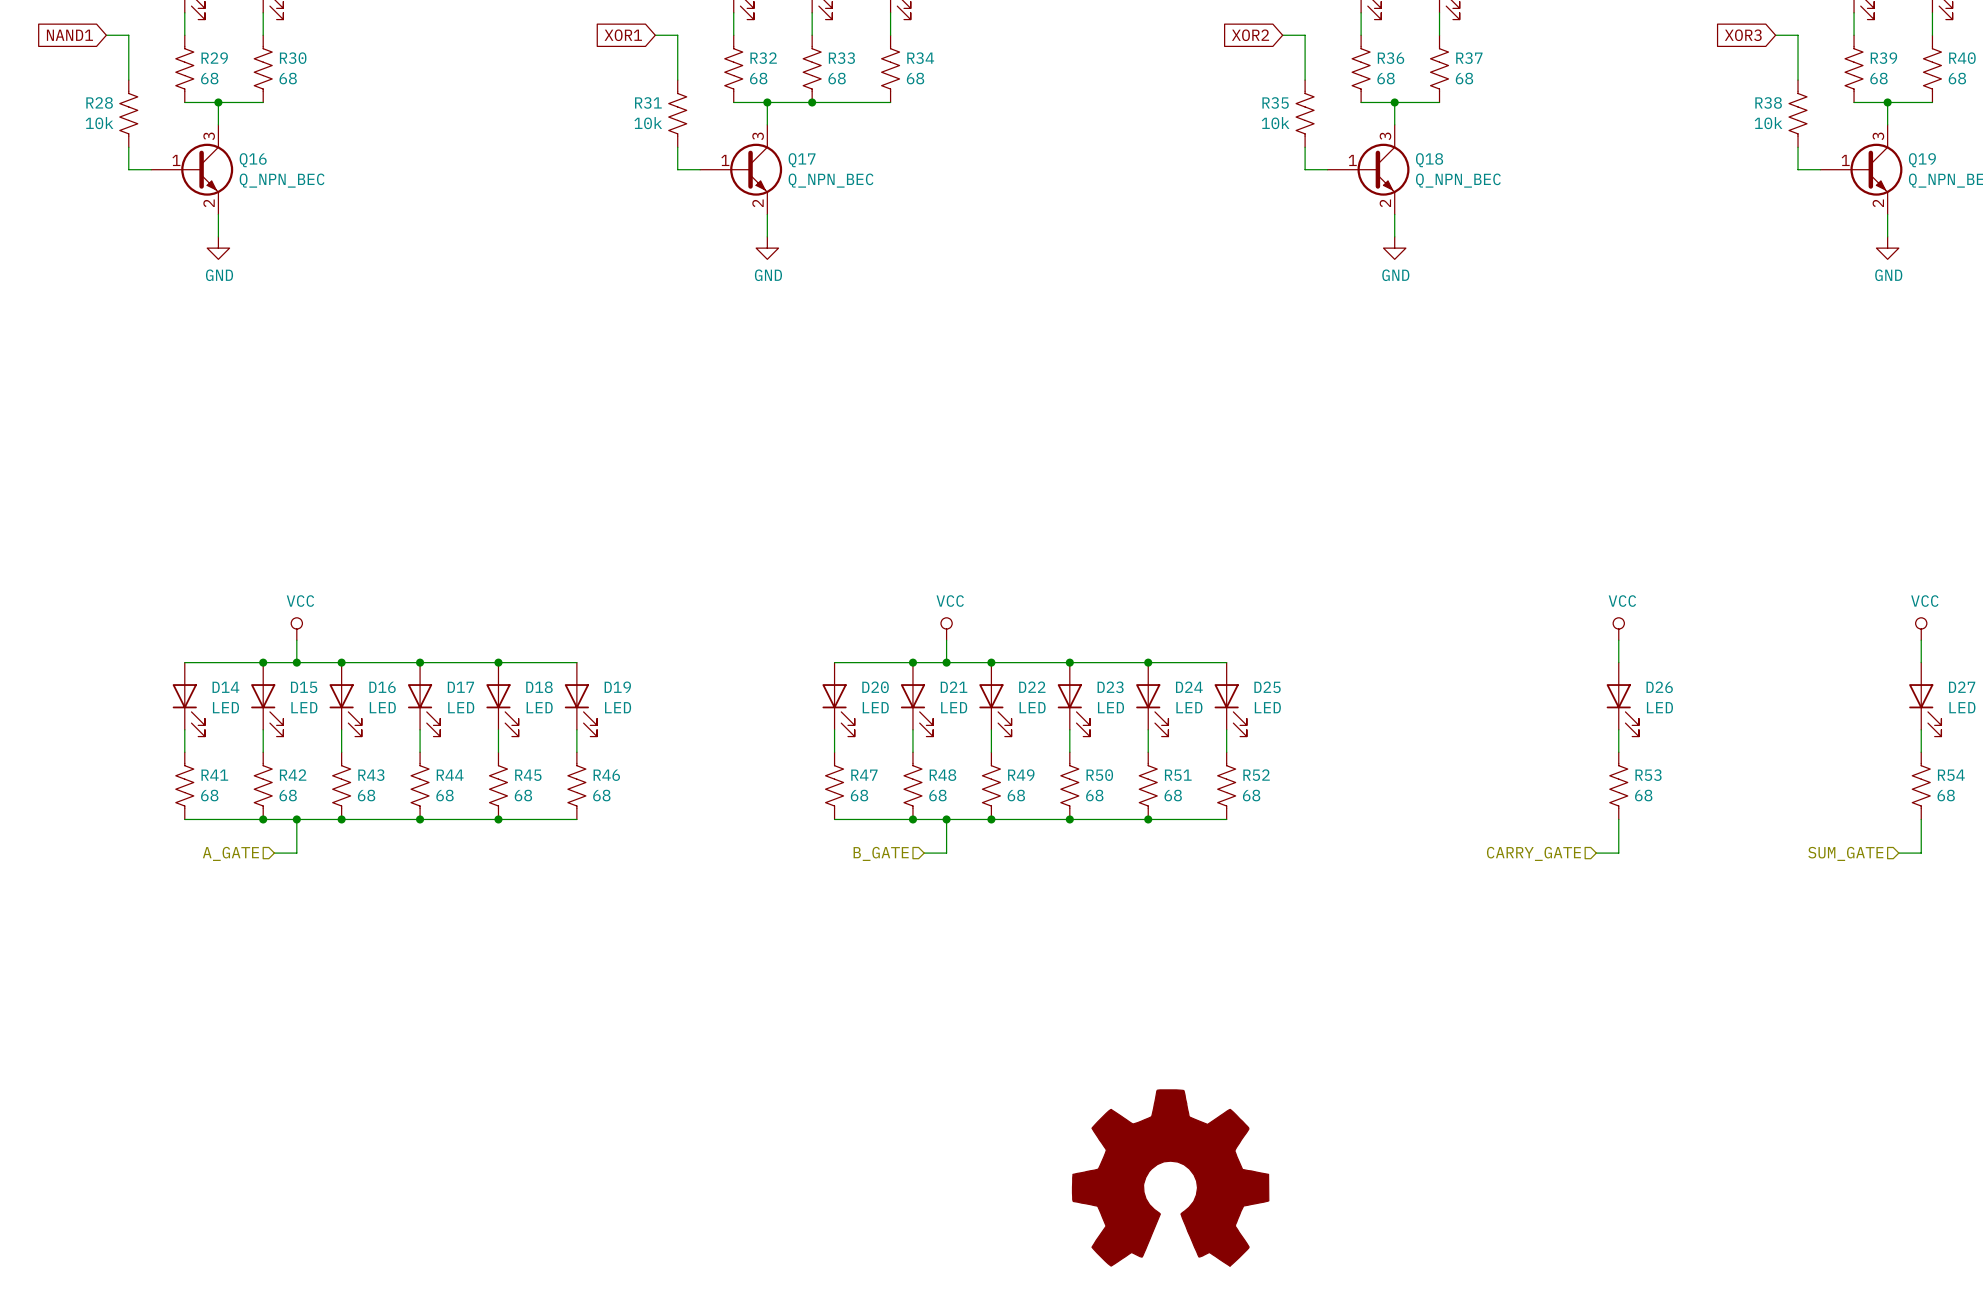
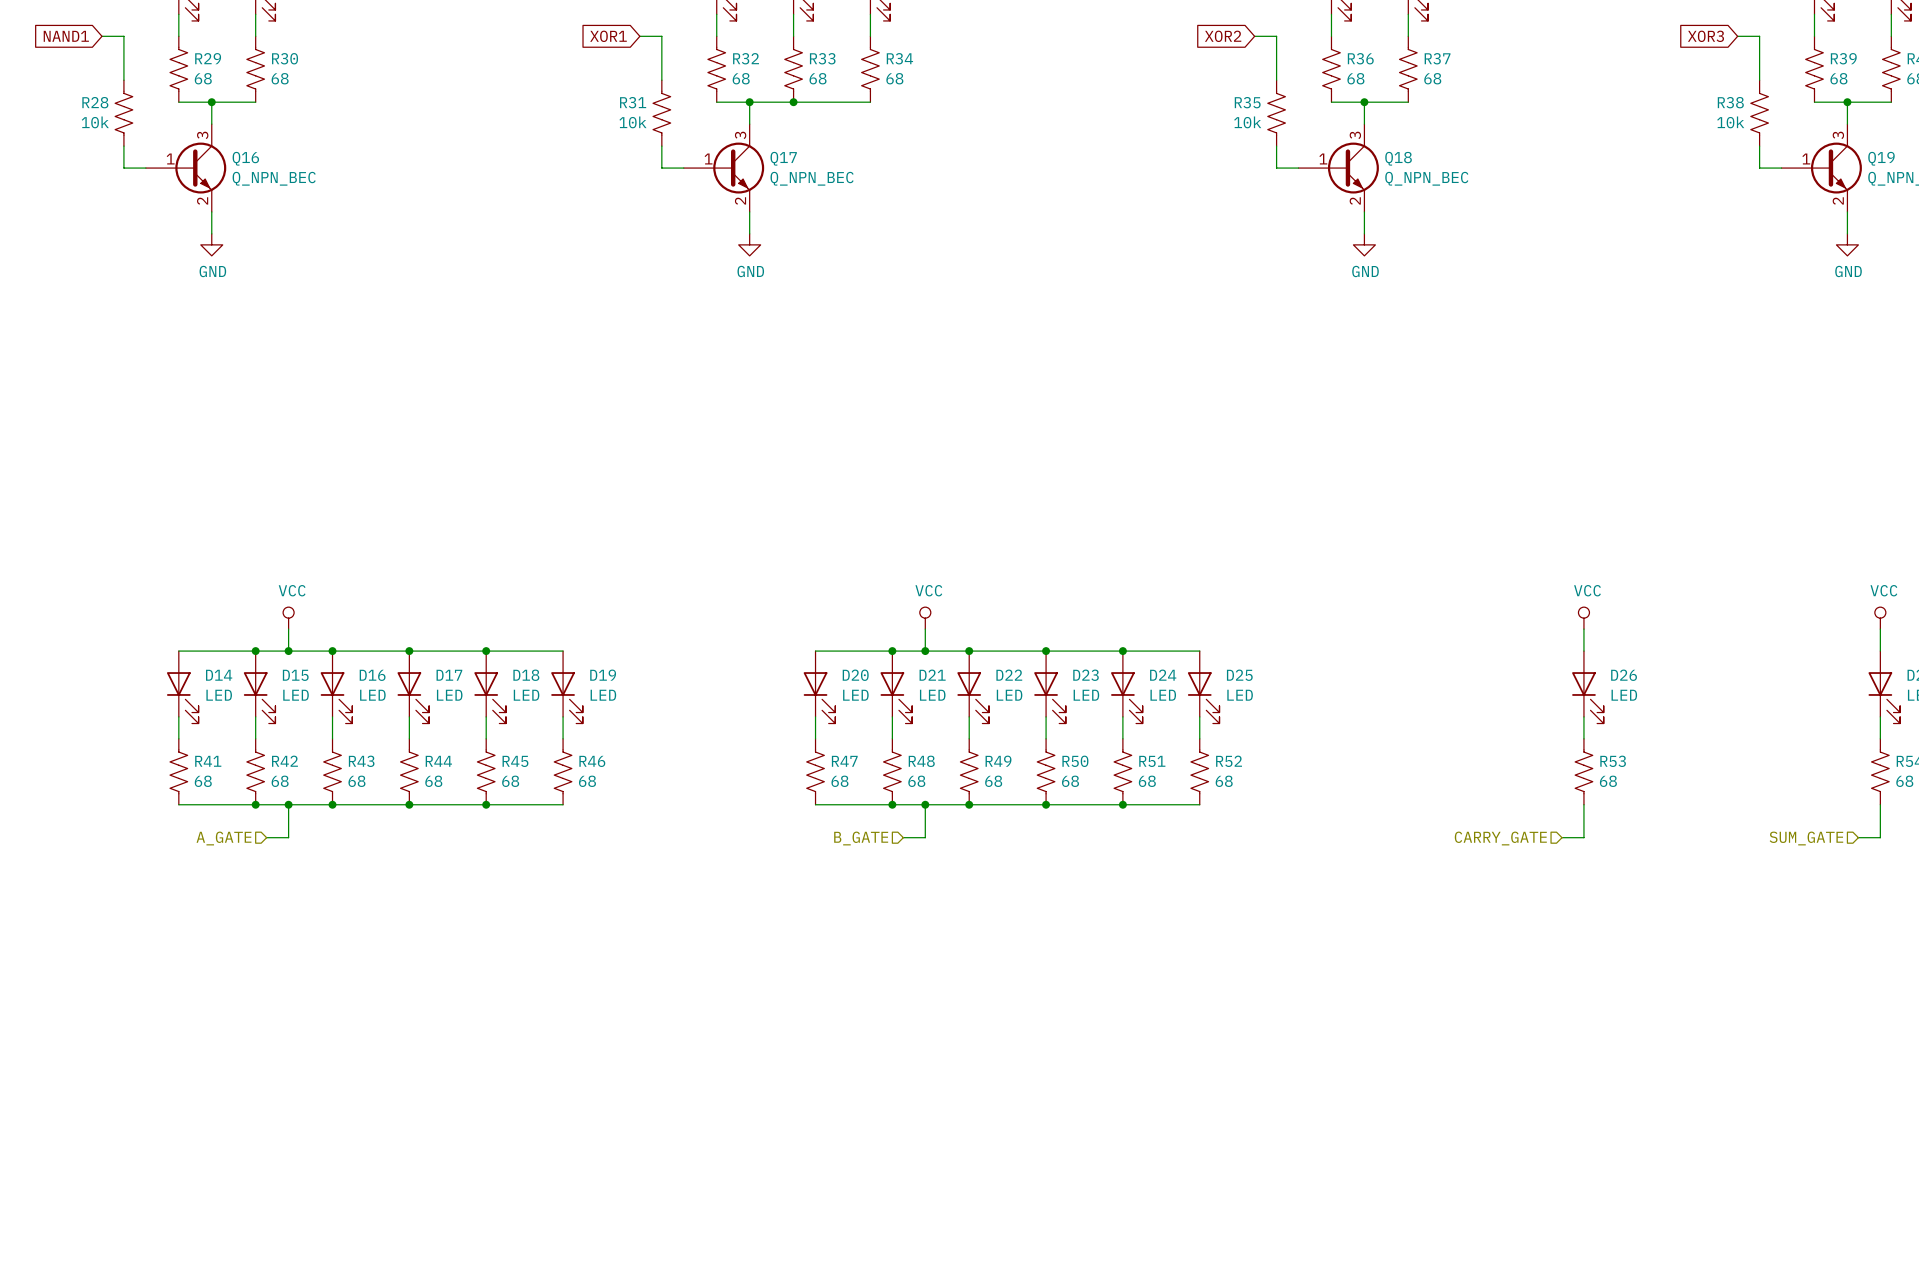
power symbol: (1170, 1177) -> none

